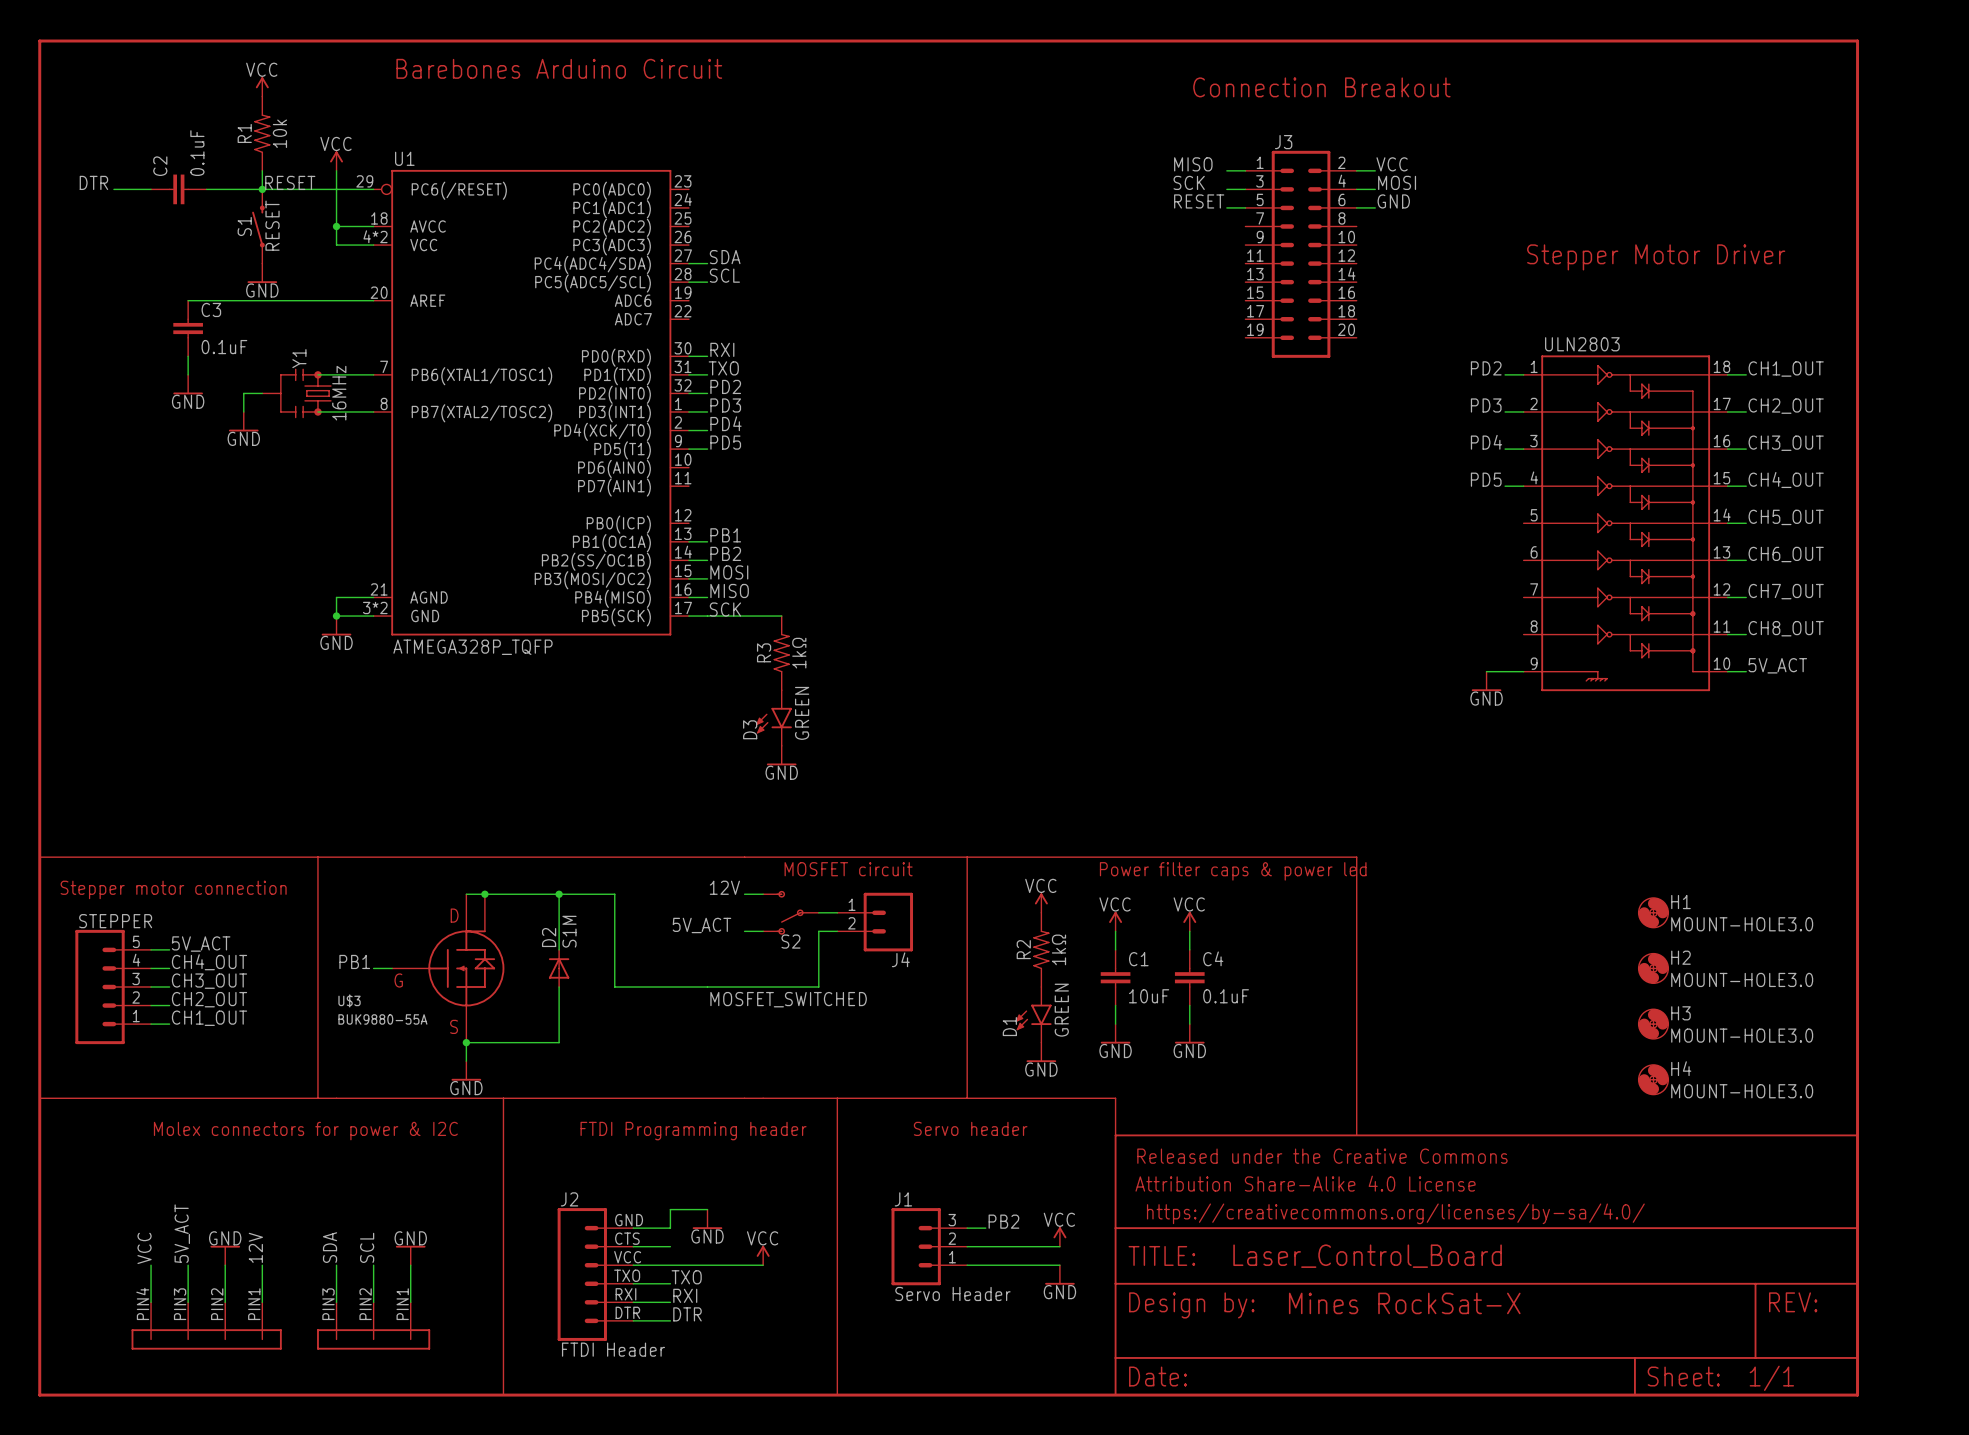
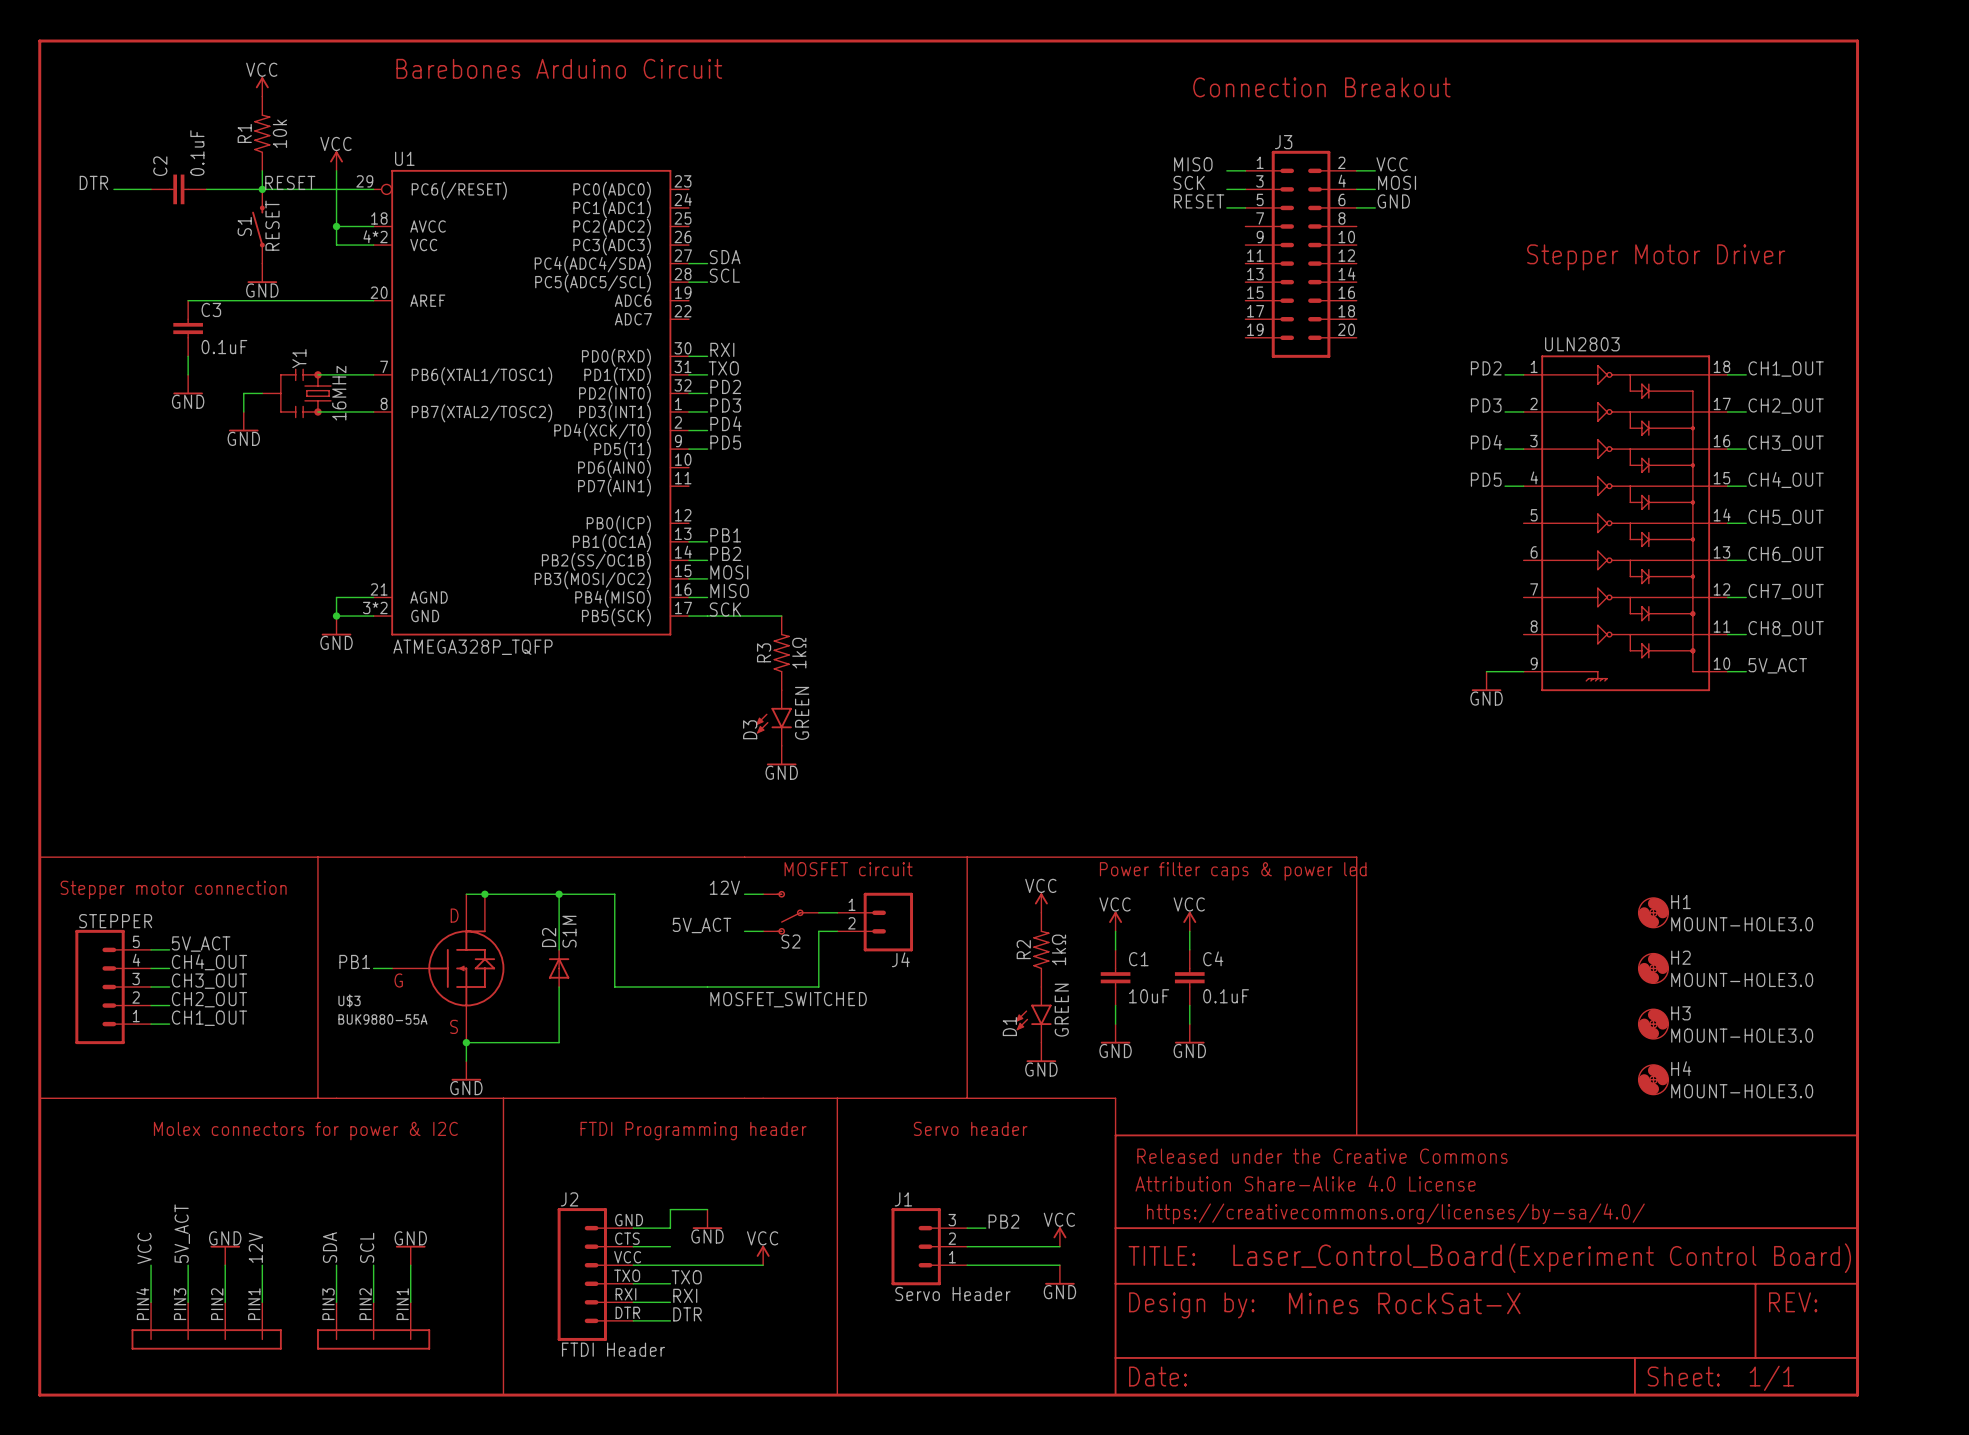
text: none -> (Experiment Control Board) (1680, 1258)

